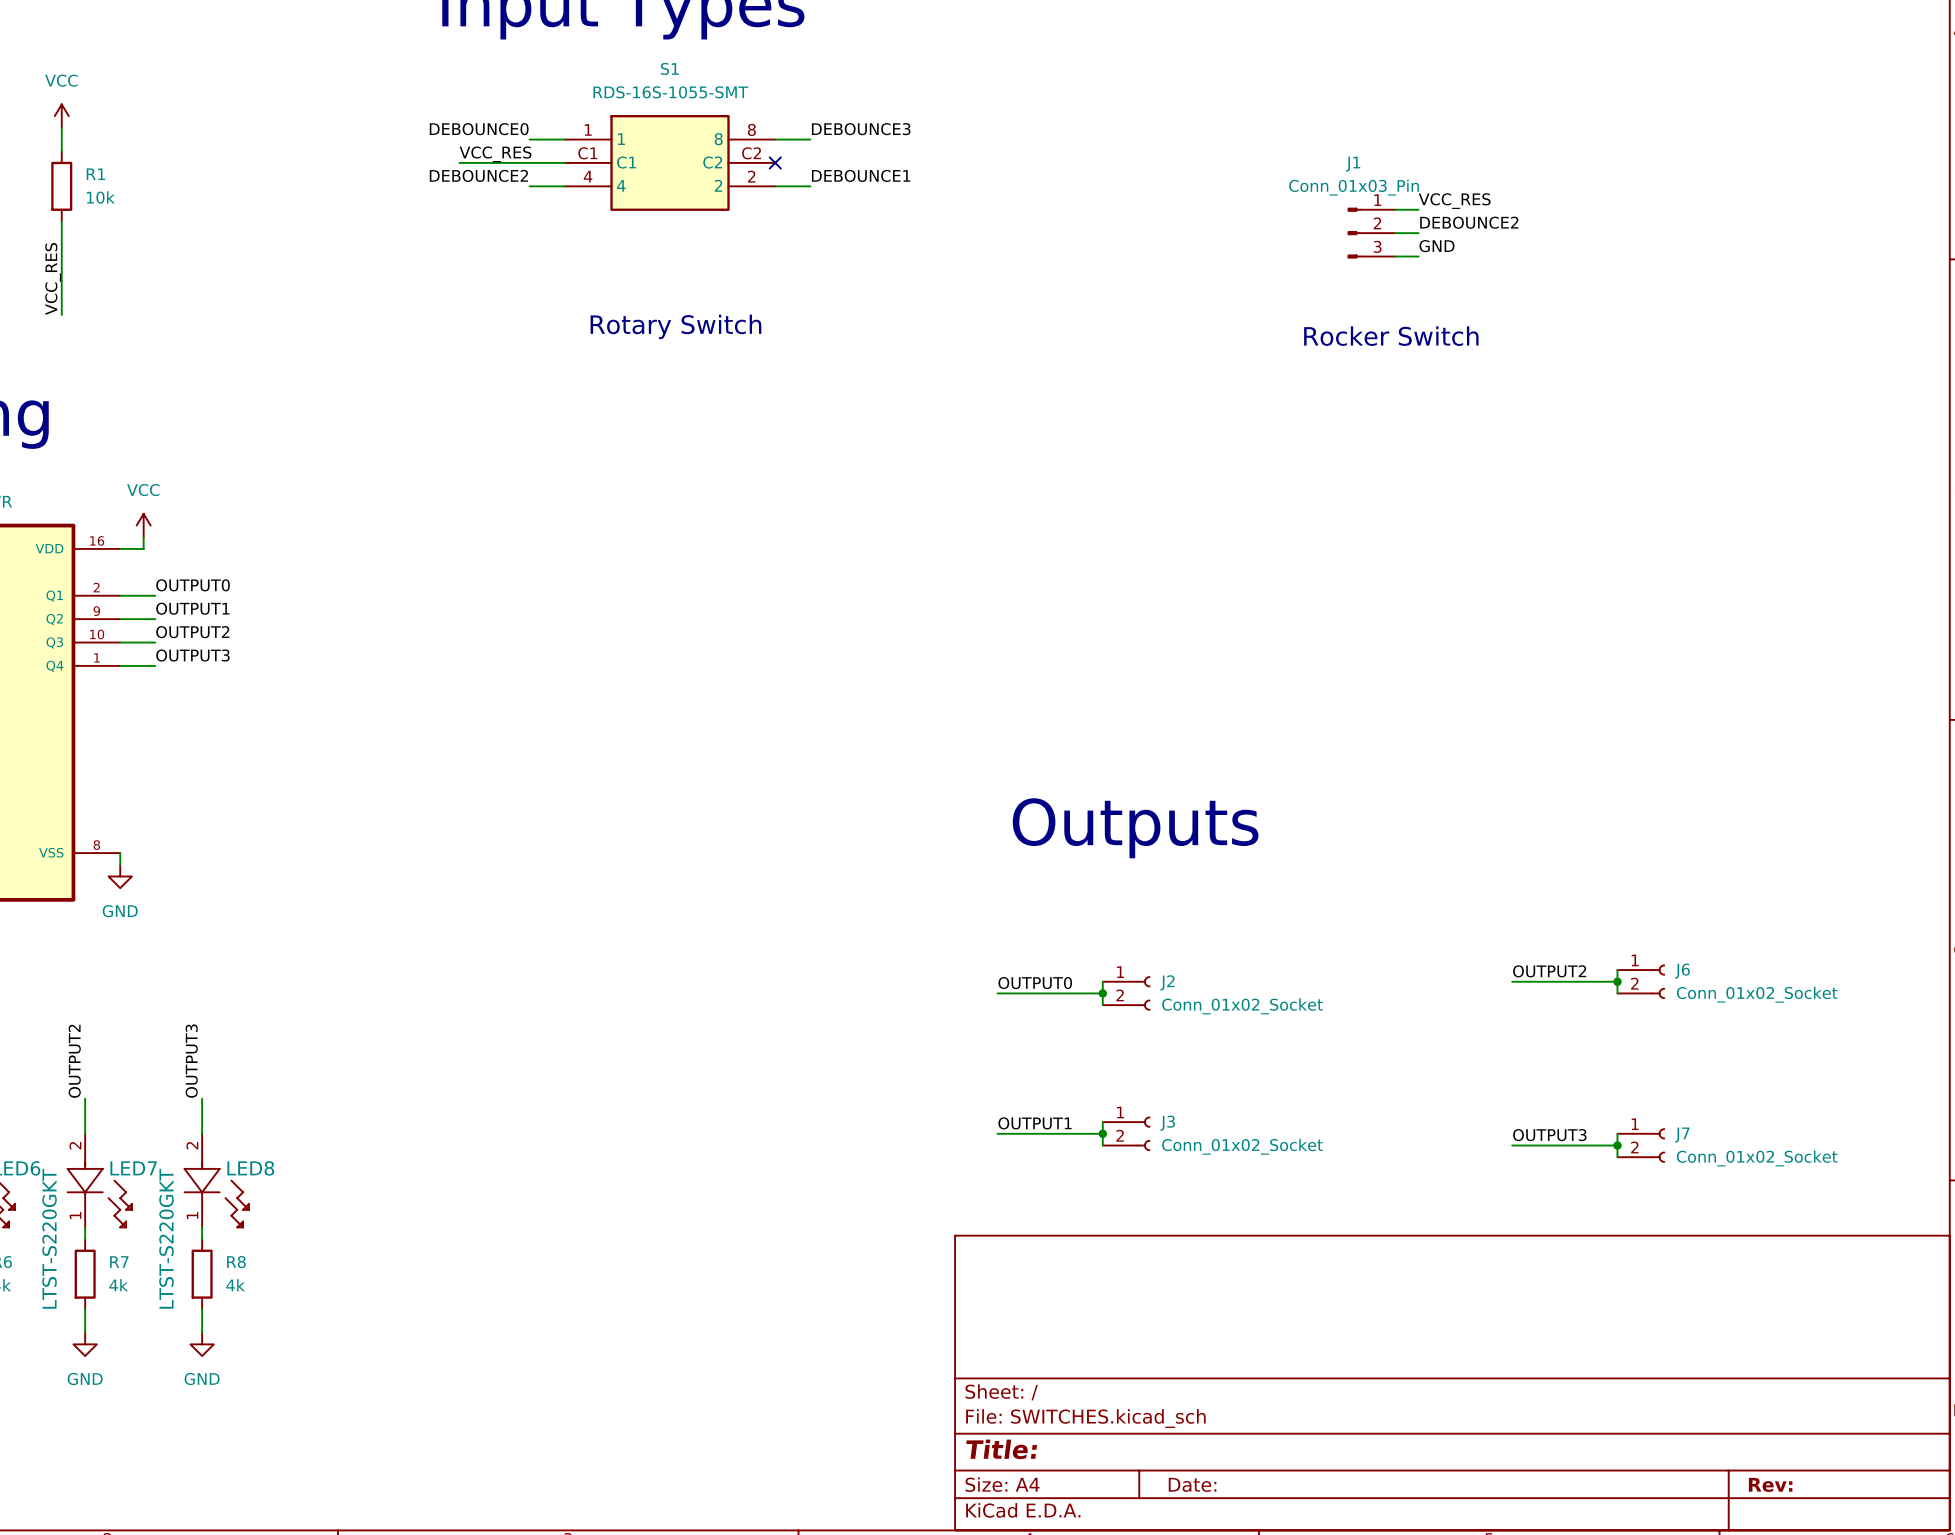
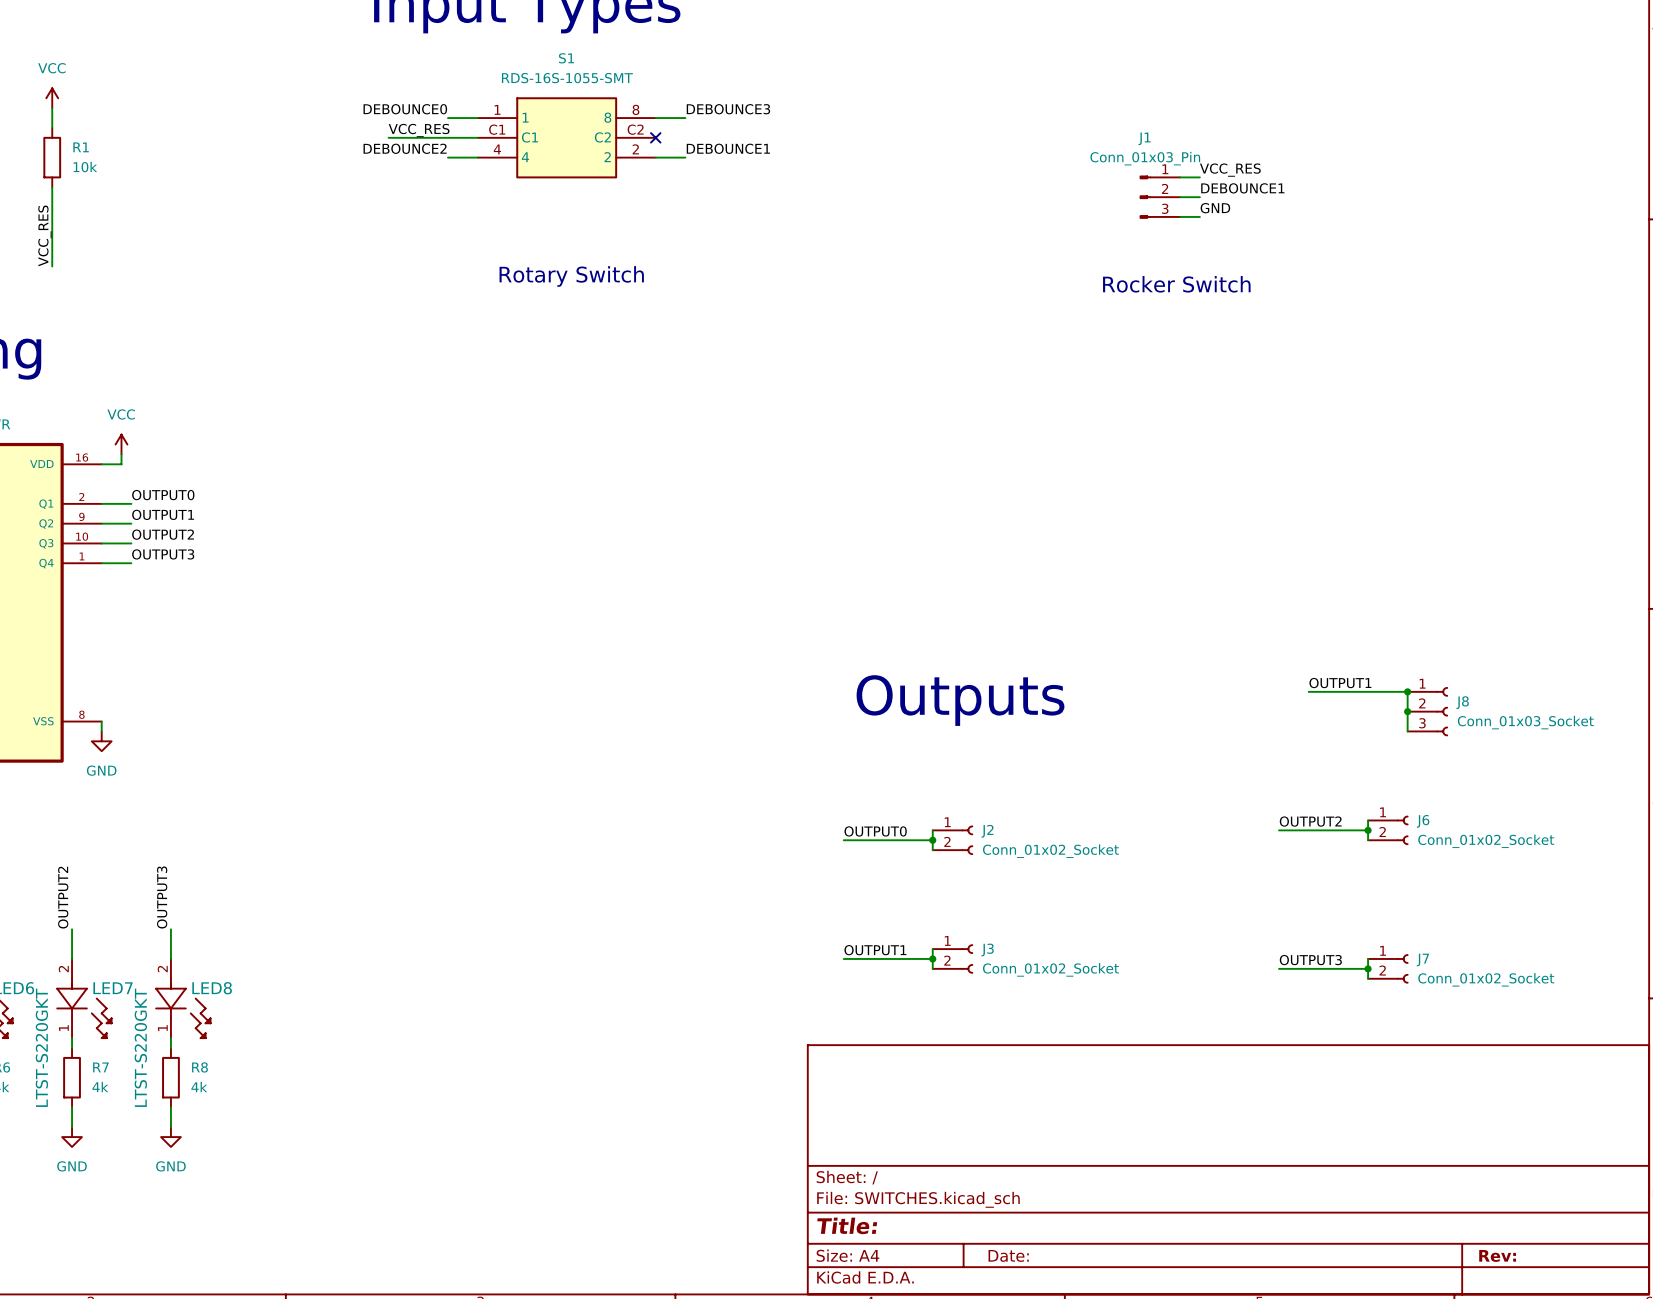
label: DEBOUNCE2 (1469, 222) -> DEBOUNCE1 (1242, 188)
label: none -> OUTPUT1 (1340, 683)
wire: none -> (1308, 691) (1407, 691) (1407, 731)
junction: none -> (1407, 691)
junction: none -> (1407, 711)
J8: none -> Conn_01x03_Socket (1427, 711)

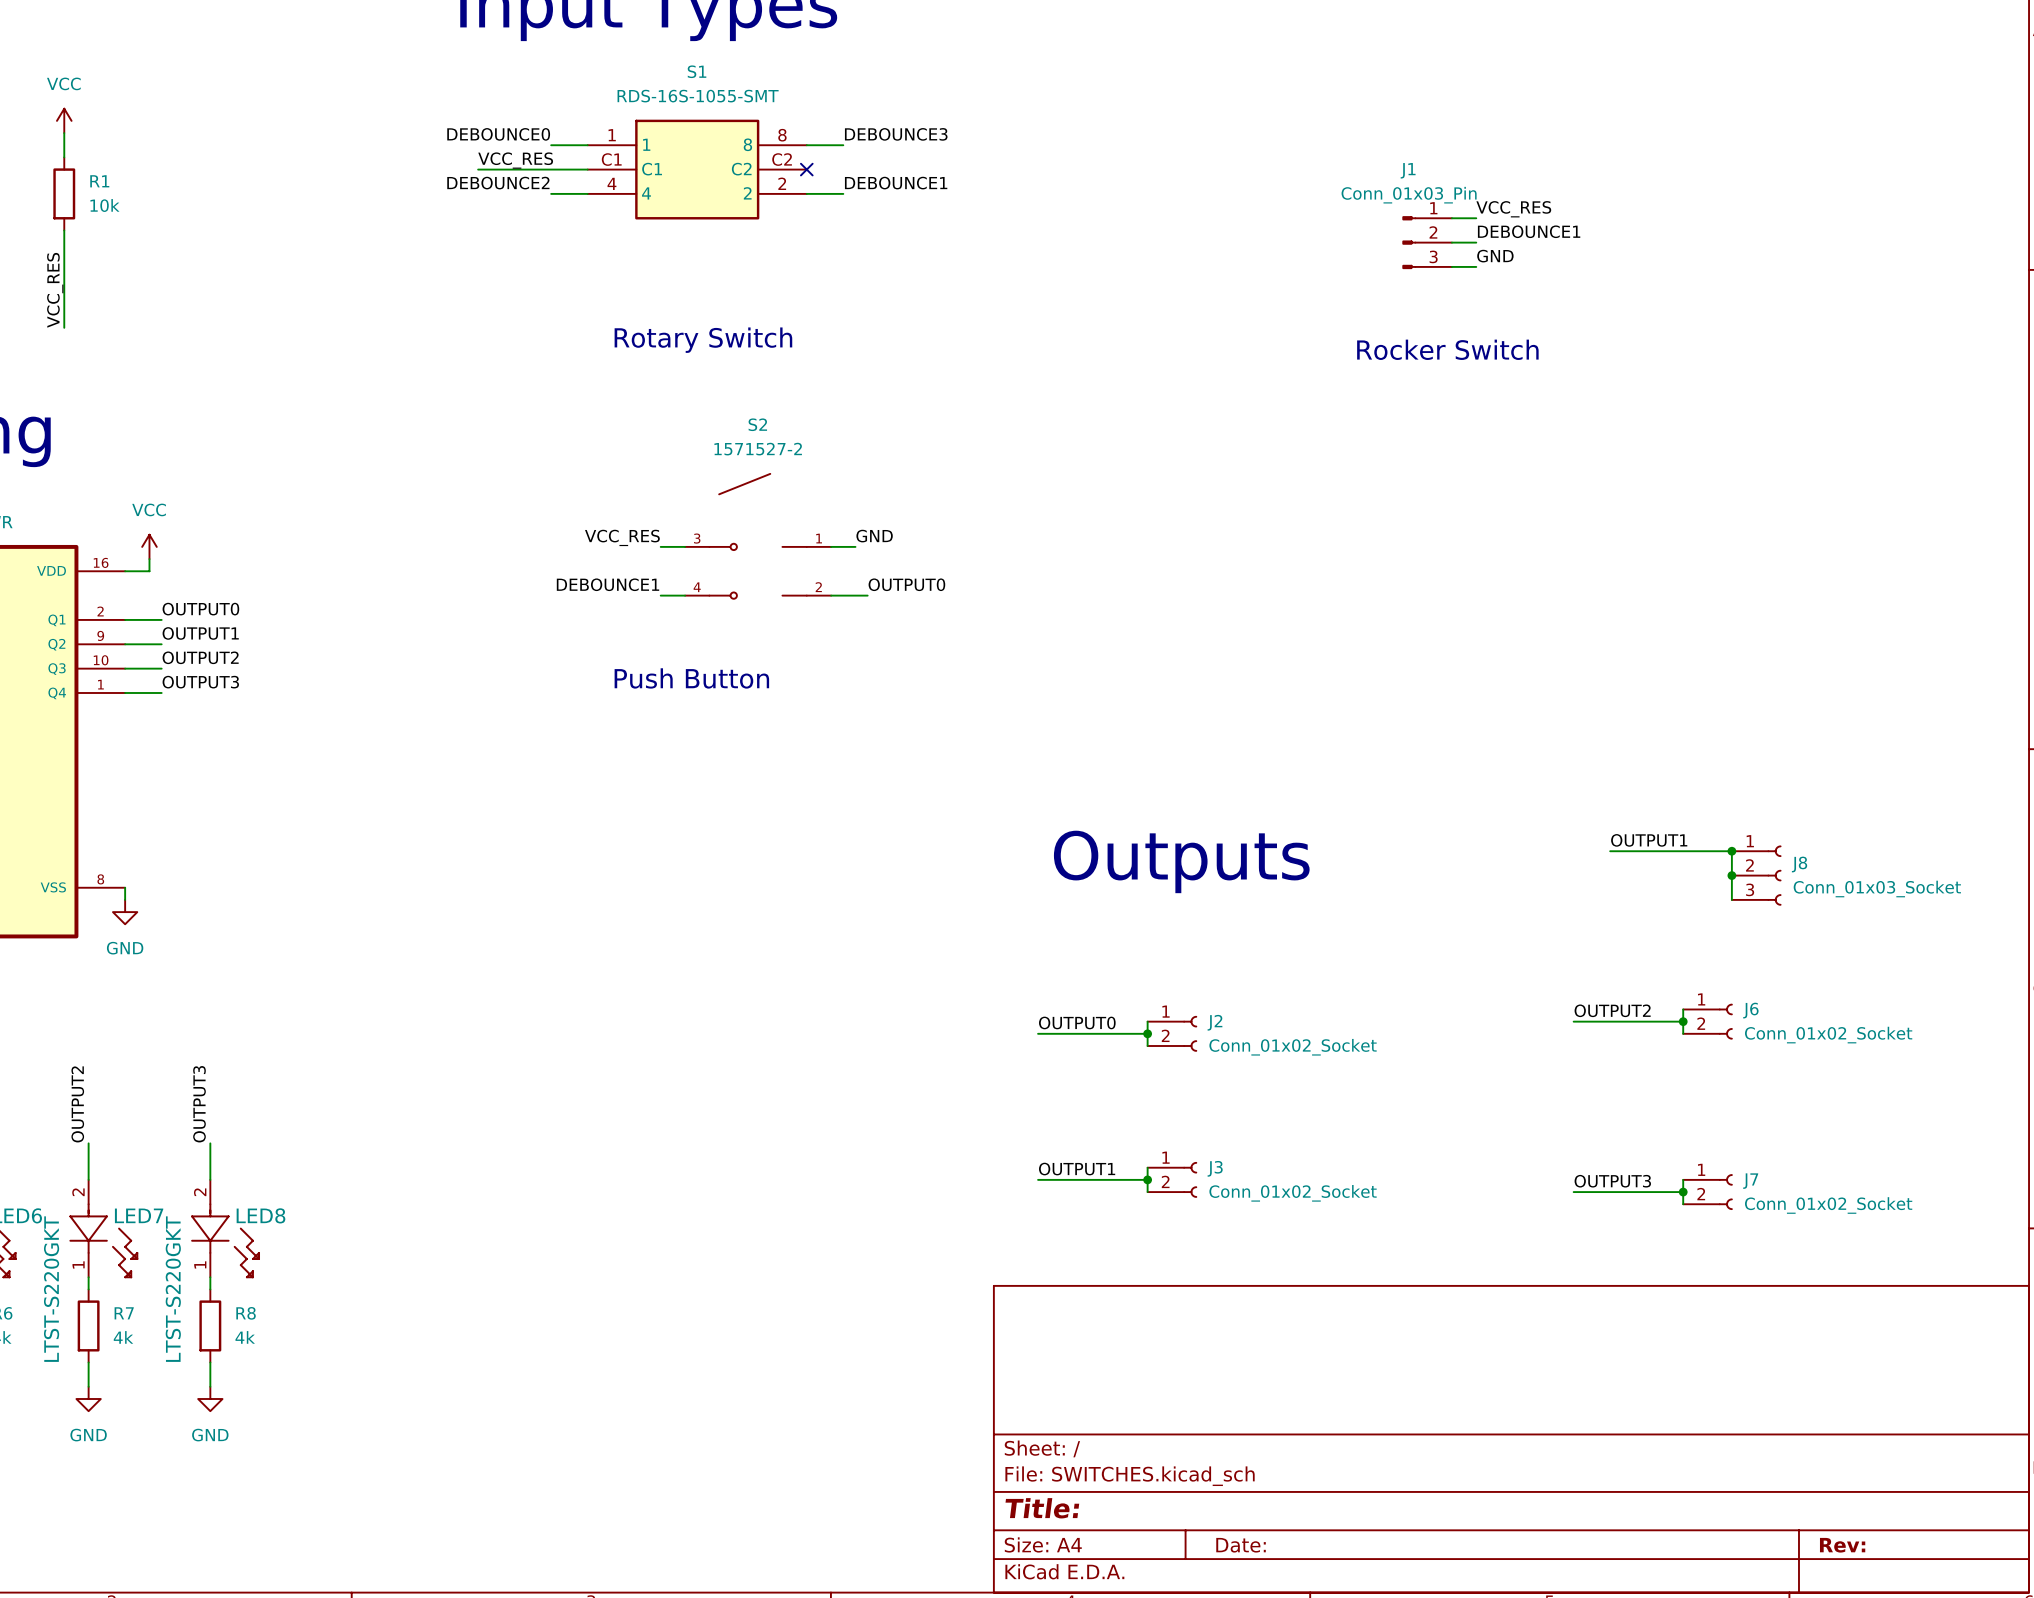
S2: none -> 1571527-2 (758, 536)
label: none -> GND (874, 536)
label: none -> VCC_RES (622, 537)
wire: none -> (660, 546) (685, 546)
wire: none -> (831, 546) (855, 546)
label: none -> DEBOUNCE1 (608, 584)
label: none -> OUTPUT0 (906, 584)
wire: none -> (660, 595) (685, 595)
wire: none -> (831, 595) (867, 595)
text: none -> Push Button (691, 678)

